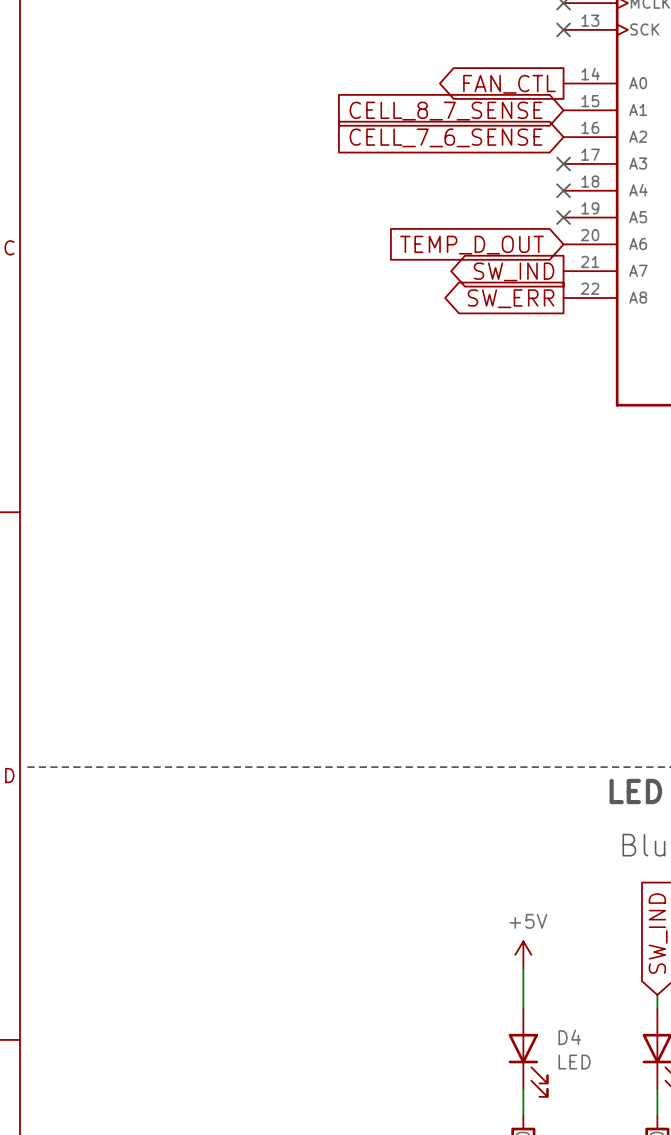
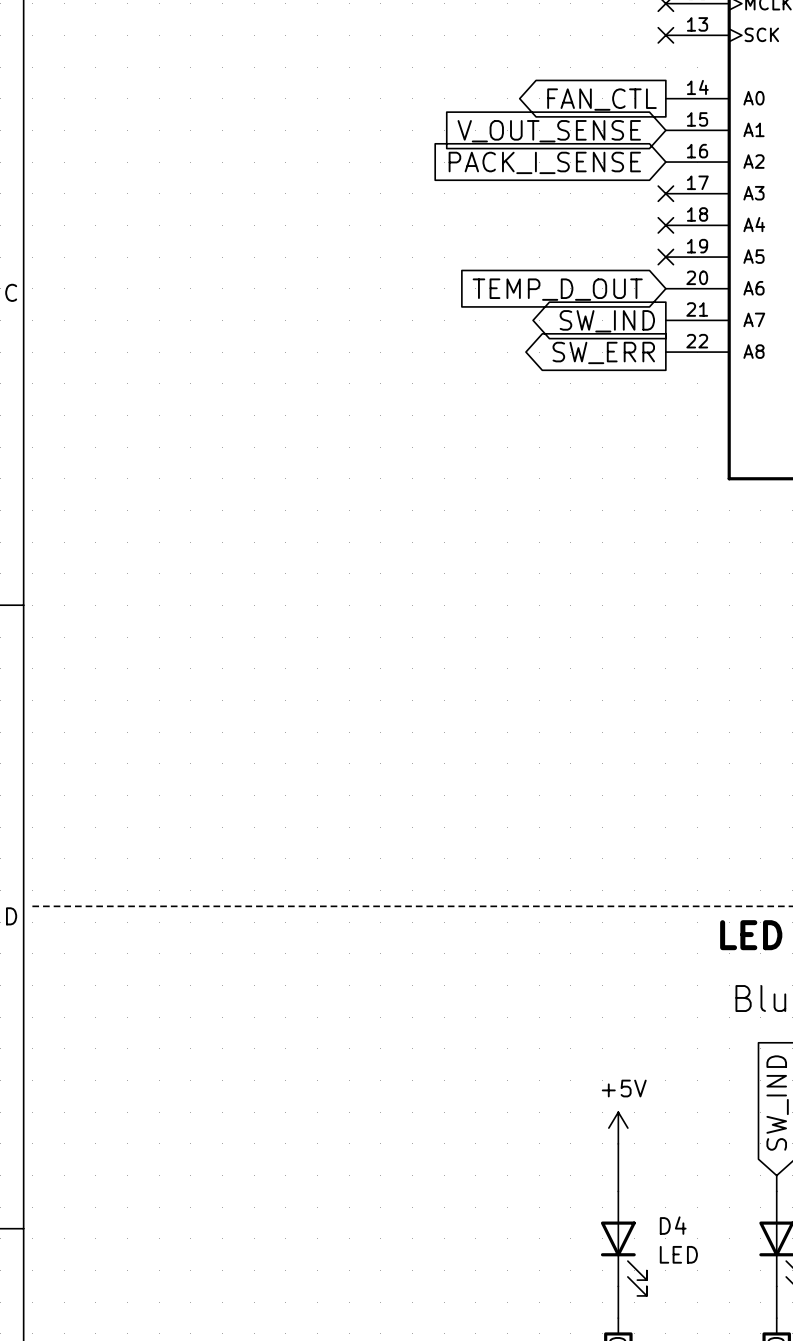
global label: CELL_8_7_SENSE (446, 111) -> V_OUT_SENSE (549, 131)
global label: CELL_7_6_SENSE (446, 137) -> PACK_I_SENSE (544, 162)

